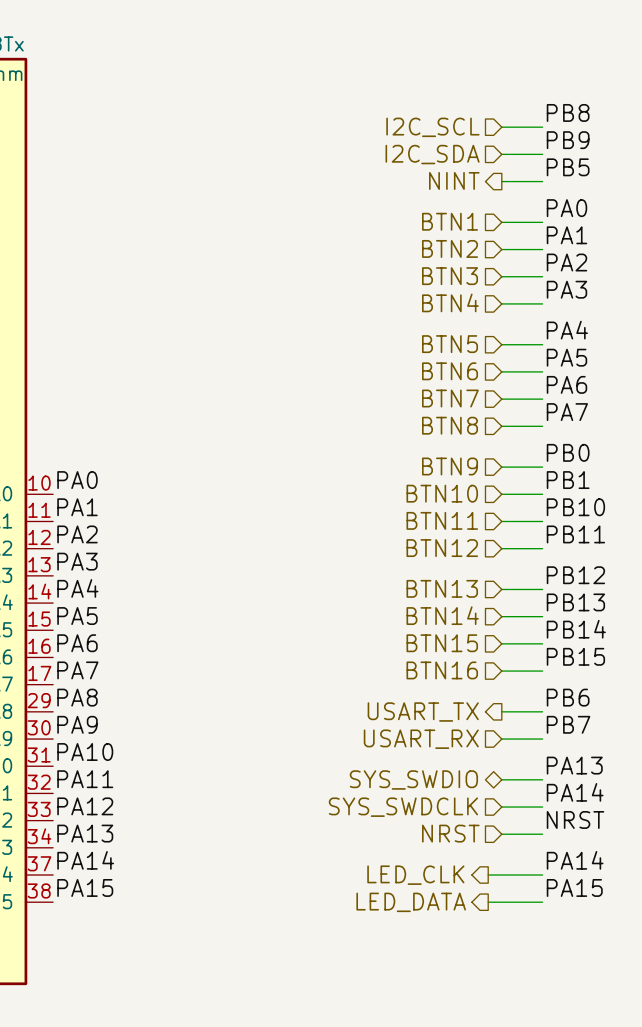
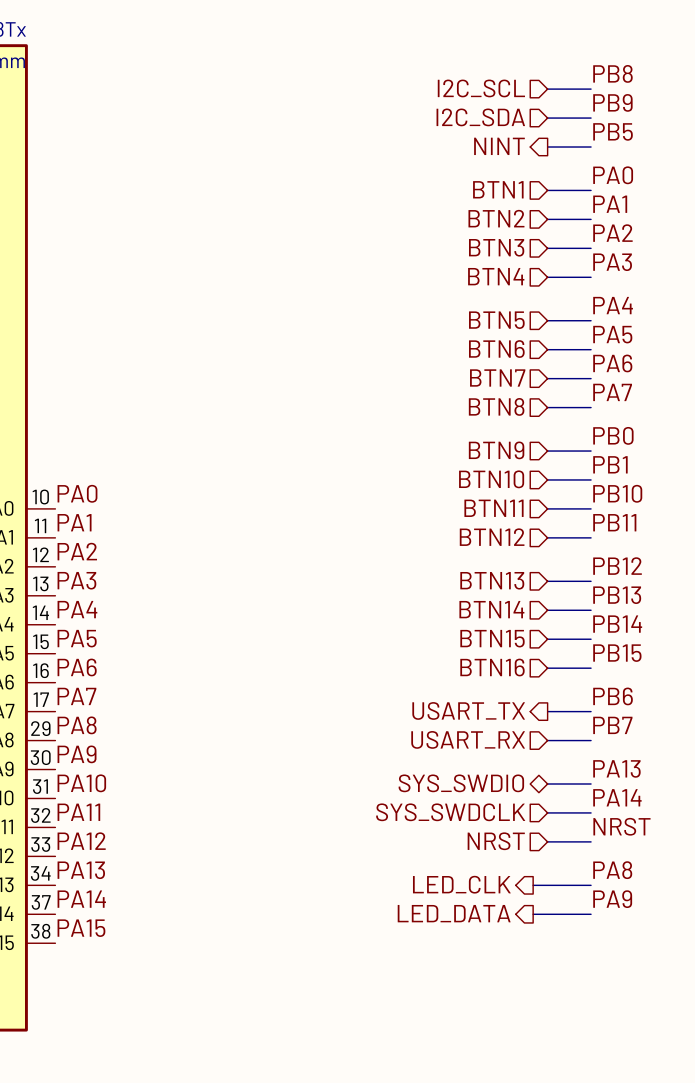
wire: none -> (547, 89) (591, 89)
label position: PB8 (568, 112) -> PB8 (612, 73)
hierarchical label position: I2C_SCL (432, 127) -> I2C_SCL (481, 88)
wire: (501, 127) (515, 127) -> (576, 118) (591, 118)
label position: PB9 (568, 140) -> PB9 (612, 102)
hierarchical label position: I2C_SDA (432, 154) -> I2C_SDA (480, 117)
wire: (501, 154) (515, 154) -> (576, 147) (591, 147)
label position: PB5 (568, 167) -> PB5 (613, 131)
hierarchical label position: NINT (454, 180) -> NINT (499, 146)
wire: (501, 181) (542, 181) -> (547, 190) (591, 190)
label position: PA0 (566, 208) -> PA0 (613, 175)
hierarchical label position: BTN1 (450, 221) -> BTN1 (498, 189)
wire: (501, 222) (515, 222) -> (576, 219) (591, 219)
label position: PA1 (566, 235) -> PA1 (610, 204)
hierarchical label position: BTN2 (450, 248) -> BTN2 (496, 218)
wire: (501, 249) (515, 249) -> (576, 248) (591, 248)
label position: PA2 (566, 262) -> PA2 (612, 233)
hierarchical label position: BTN3 (450, 276) -> BTN3 (496, 247)
wire: (501, 276) (515, 276) -> (576, 277) (591, 277)
label position: PA3 (566, 289) -> PA3 (612, 262)
hierarchical label position: BTN4 (450, 302) -> BTN4 (496, 276)
wire: (501, 303) (542, 303) -> (547, 320) (591, 320)
label position: PA4 (567, 330) -> PA4 (613, 305)
hierarchical label position: BTN5 (450, 344) -> BTN5 (496, 320)
wire: (501, 344) (515, 344) -> (576, 349) (591, 349)
label position: PA5 (566, 357) -> PA5 (612, 334)
hierarchical label position: BTN6 (450, 371) -> BTN6 (496, 349)
wire: (501, 371) (515, 371) -> (576, 378) (591, 378)
label position: PA6 (566, 384) -> PA6 (612, 363)
hierarchical label position: BTN7 (450, 398) -> BTN7 (497, 377)
wire: (501, 399) (515, 399) -> (576, 407) (591, 407)
label position: PA7 (567, 412) -> PA7 (612, 392)
hierarchical label position: BTN8 (450, 425) -> BTN8 (496, 406)
wire: (501, 426) (542, 426) -> (547, 451) (591, 451)
label position: PB0 (568, 452) -> PB0 (613, 435)
hierarchical label position: BTN9 (450, 466) -> BTN9 (496, 450)
wire: (501, 467) (515, 467) -> (576, 479) (591, 479)
label position: PB1 (568, 480) -> PB1 (610, 464)
hierarchical label position: BTN10 (442, 493) -> BTN10 (491, 479)
wire: (501, 494) (515, 494) -> (576, 508) (591, 508)
label position: PB10 (575, 507) -> PB10 (617, 493)
hierarchical label position: BTN11 (442, 520) -> BTN11 (494, 508)
wire: (501, 521) (515, 521) -> (576, 537) (591, 537)
label position: PB11 (575, 534) -> PB11 (614, 522)
hierarchical label position: BTN12 (442, 548) -> BTN12 (492, 537)
wire: (501, 548) (542, 548) -> (547, 581) (591, 581)
label position: PB12 (575, 575) -> PB12 (617, 566)
hierarchical label position: BTN13 (442, 588) -> BTN13 (492, 580)
wire: (501, 589) (515, 589) -> (576, 610) (591, 610)
label position: PB13 (575, 602) -> PB13 (617, 595)
hierarchical label position: BTN14 (442, 615) -> BTN14 (491, 609)
wire: (501, 616) (515, 616) -> (576, 639) (591, 639)
label position: PB14 (576, 629) -> PB14 (617, 624)
hierarchical label position: BTN15 (442, 643) -> BTN15 (492, 638)
wire: (501, 643) (515, 643) -> (576, 668) (591, 668)
label position: PB15 (575, 656) -> PB15 (617, 653)
hierarchical label position: BTN16 (442, 670) -> BTN16 (492, 667)
wire: (501, 671) (542, 671) -> (547, 711) (591, 711)
label position: PB6 (568, 697) -> PB6 (613, 696)
wire: (501, 711) (515, 711) -> (576, 740) (591, 740)
hierarchical label position: USART_TX (423, 712) -> USART_TX (468, 710)
label position: PB7 (568, 724) -> PB7 (612, 725)
hierarchical label position: USART_RX (421, 739) -> USART_RX (468, 739)
wire: (501, 739) (542, 739) -> (547, 783) (591, 783)
label position: PA13 (574, 765) -> PA13 (616, 768)
hierarchical label position: SYS_SWDIO (413, 779) -> SYS_SWDIO (461, 783)
wire: (501, 779) (515, 779) -> (576, 812) (591, 812)
label position: PA14 (575, 792) -> PA14 (617, 797)
hierarchical label position: SYS_SWDCLK (403, 807) -> SYS_SWDCLK (450, 812)
wire: (501, 807) (515, 807) -> (576, 841) (591, 841)
label position: NRST (575, 819) -> NRST (621, 826)
hierarchical label position: NRST (450, 833) -> NRST (496, 841)
label: none -> PA8 (612, 870)
wire: (501, 834) (542, 834) -> none
label: PA14 (575, 860) -> none
label: none -> PA9 (612, 899)
hierarchical label position: LED_CLK (415, 875) -> LED_CLK (461, 884)
wire: (488, 875) (501, 875) -> (576, 914) (591, 914)
label: PA15 (574, 887) -> none
hierarchical label position: LED_DATA (411, 902) -> LED_DATA (454, 913)
wire: (488, 902) (542, 902) -> (533, 885) (591, 885)

